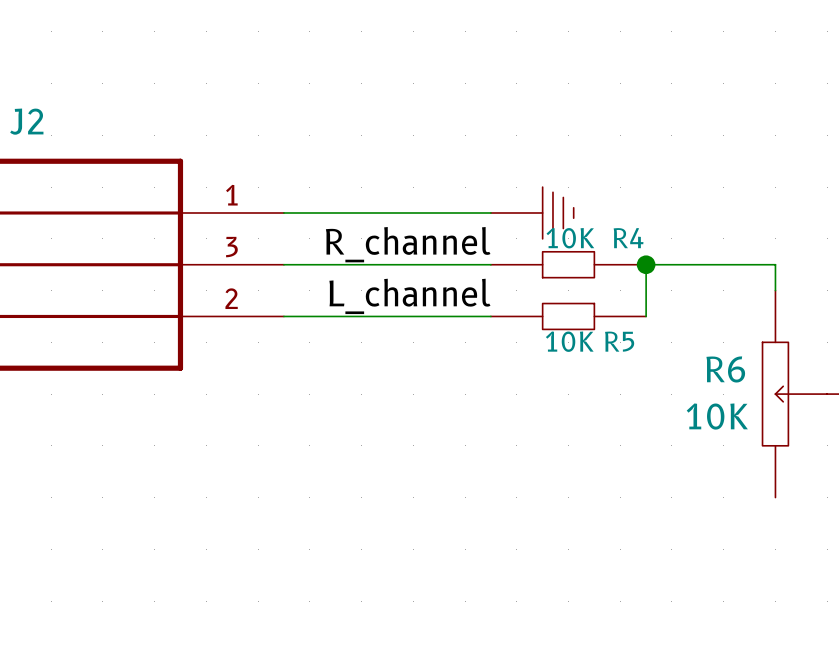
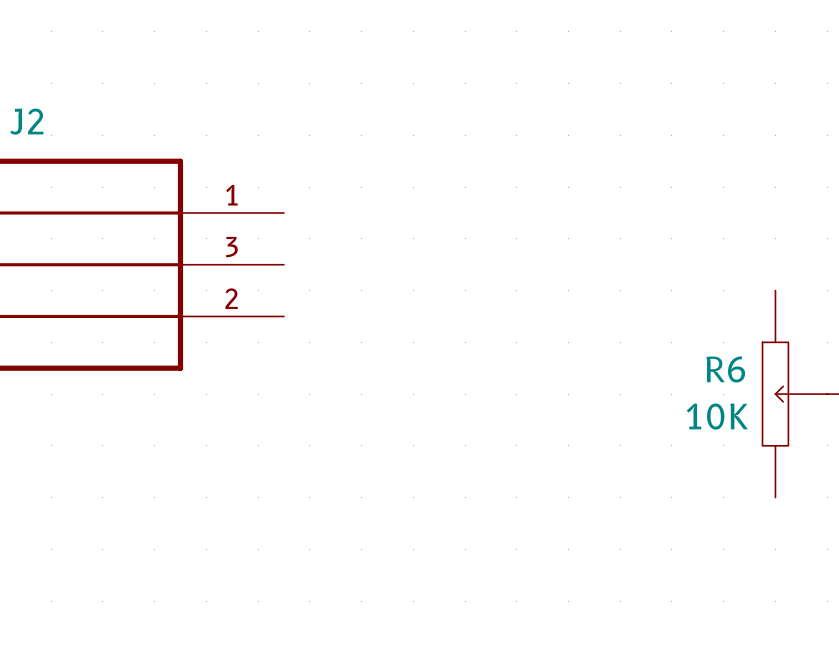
wire: (283, 212) (490, 212) -> none
power symbol: (532, 212) -> none
label: R_channel (408, 244) -> none
wire: (283, 264) (490, 264) -> none
R4: (568, 264) -> none
junction: (646, 264) -> none
wire: (775, 290) (775, 264) (646, 264) (646, 316) -> none
label: L_channel (409, 296) -> none
wire: (283, 316) (490, 316) -> none
R5: (568, 316) -> none

